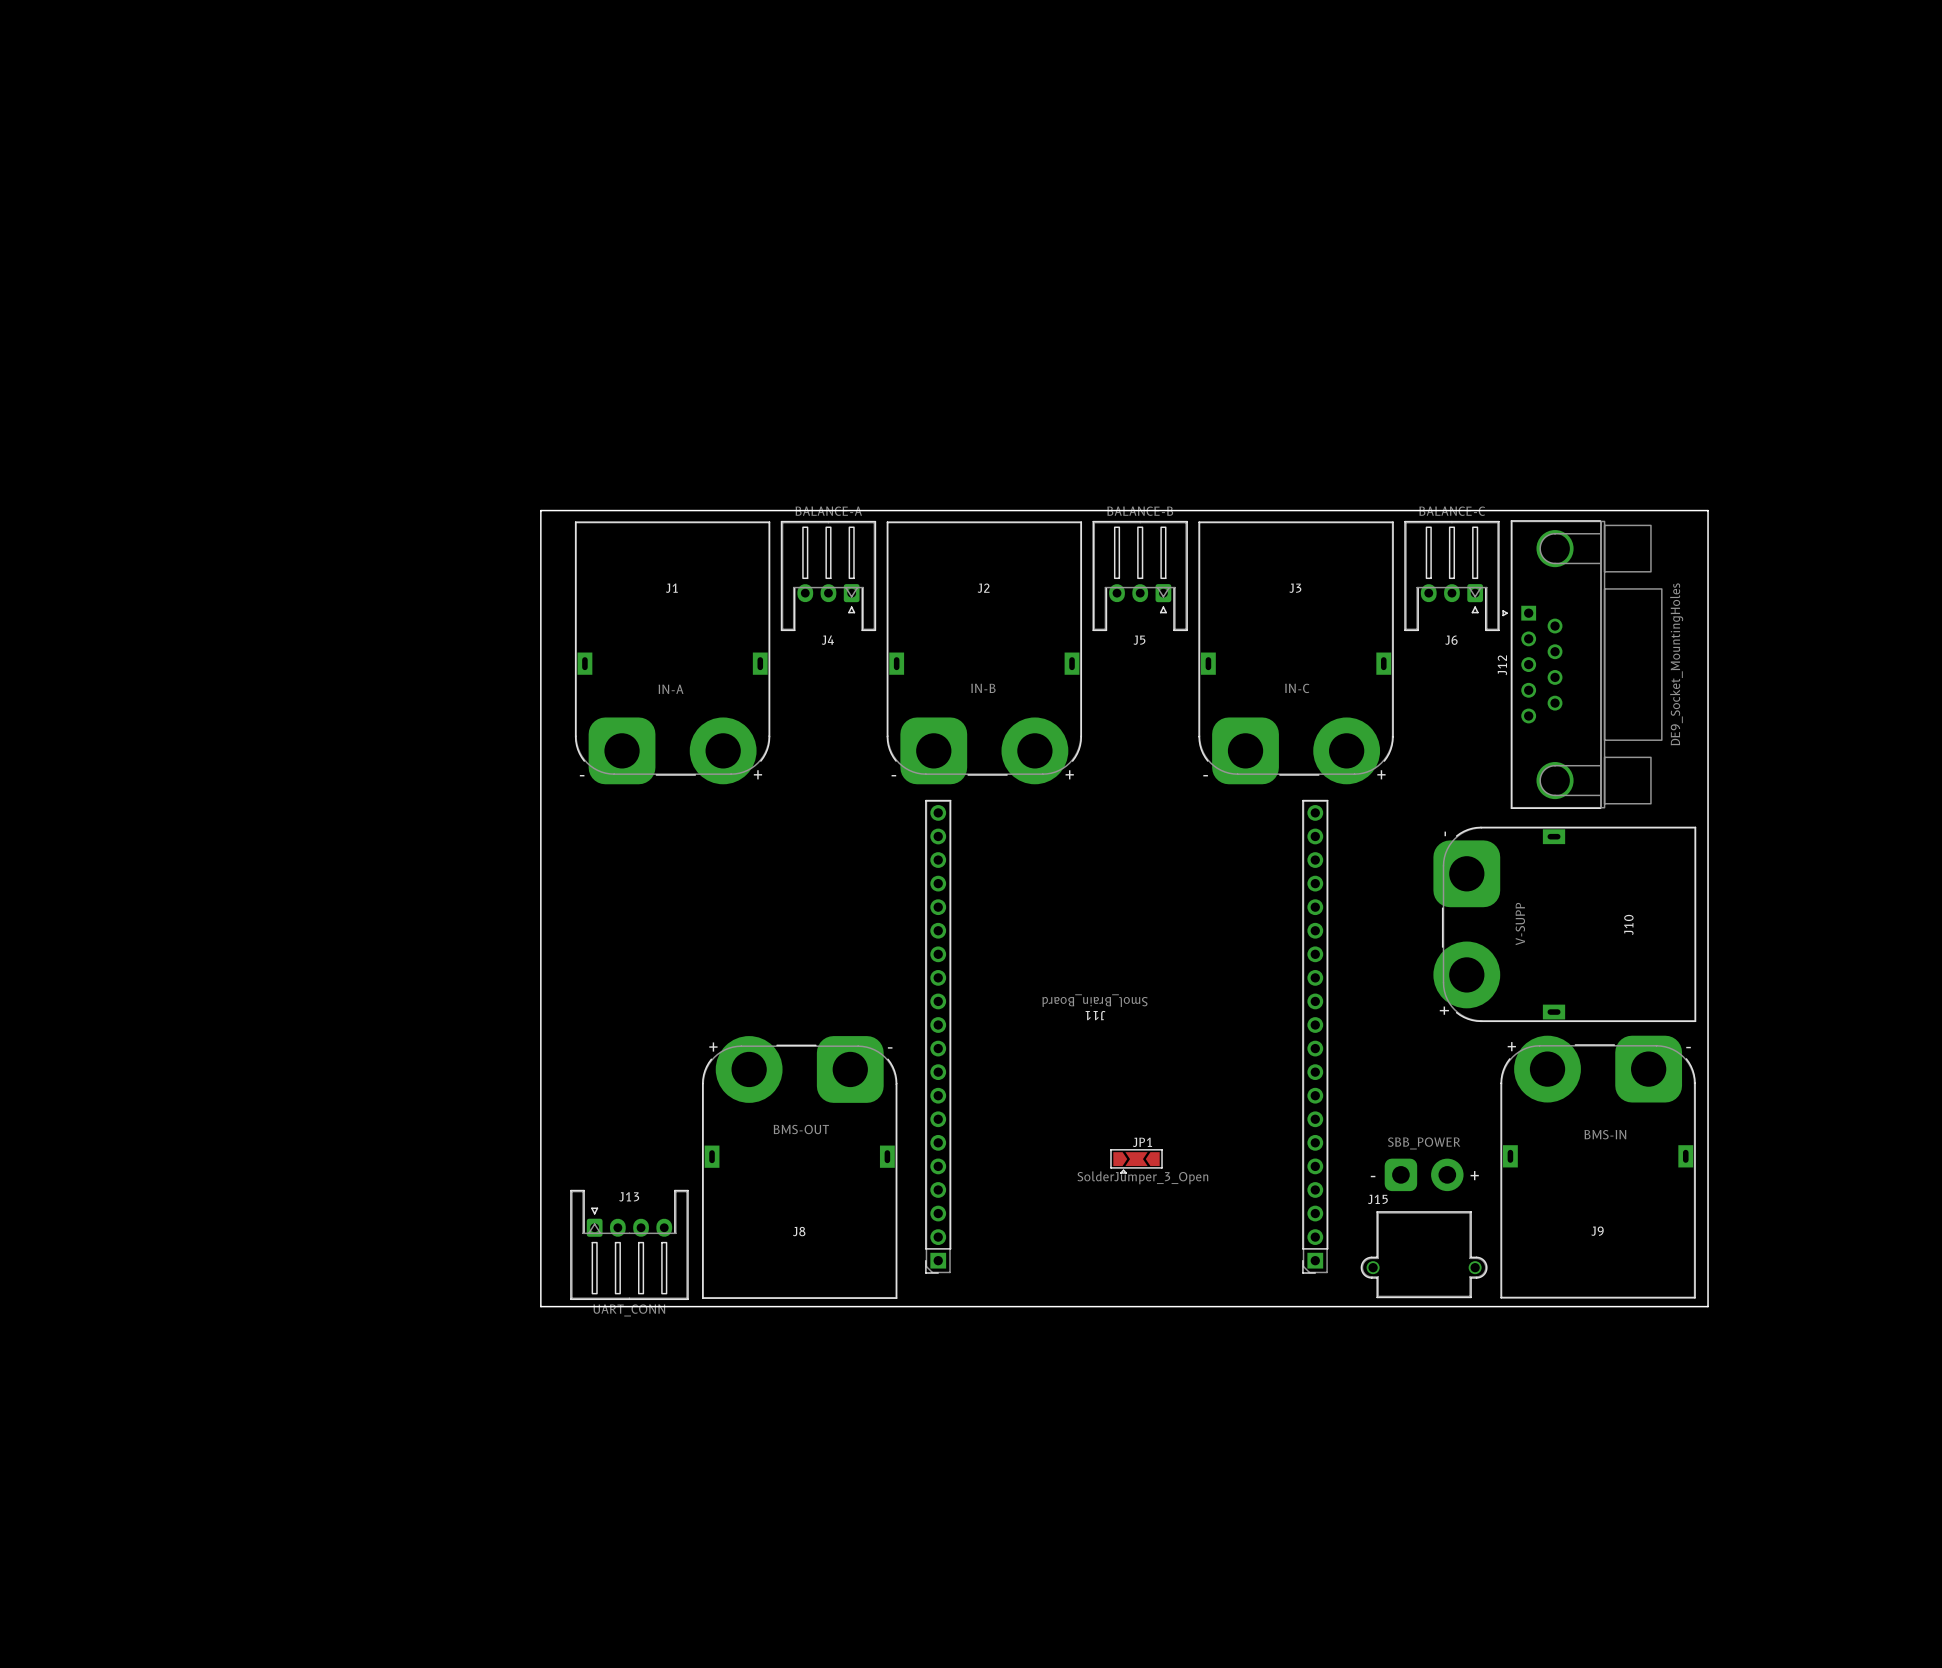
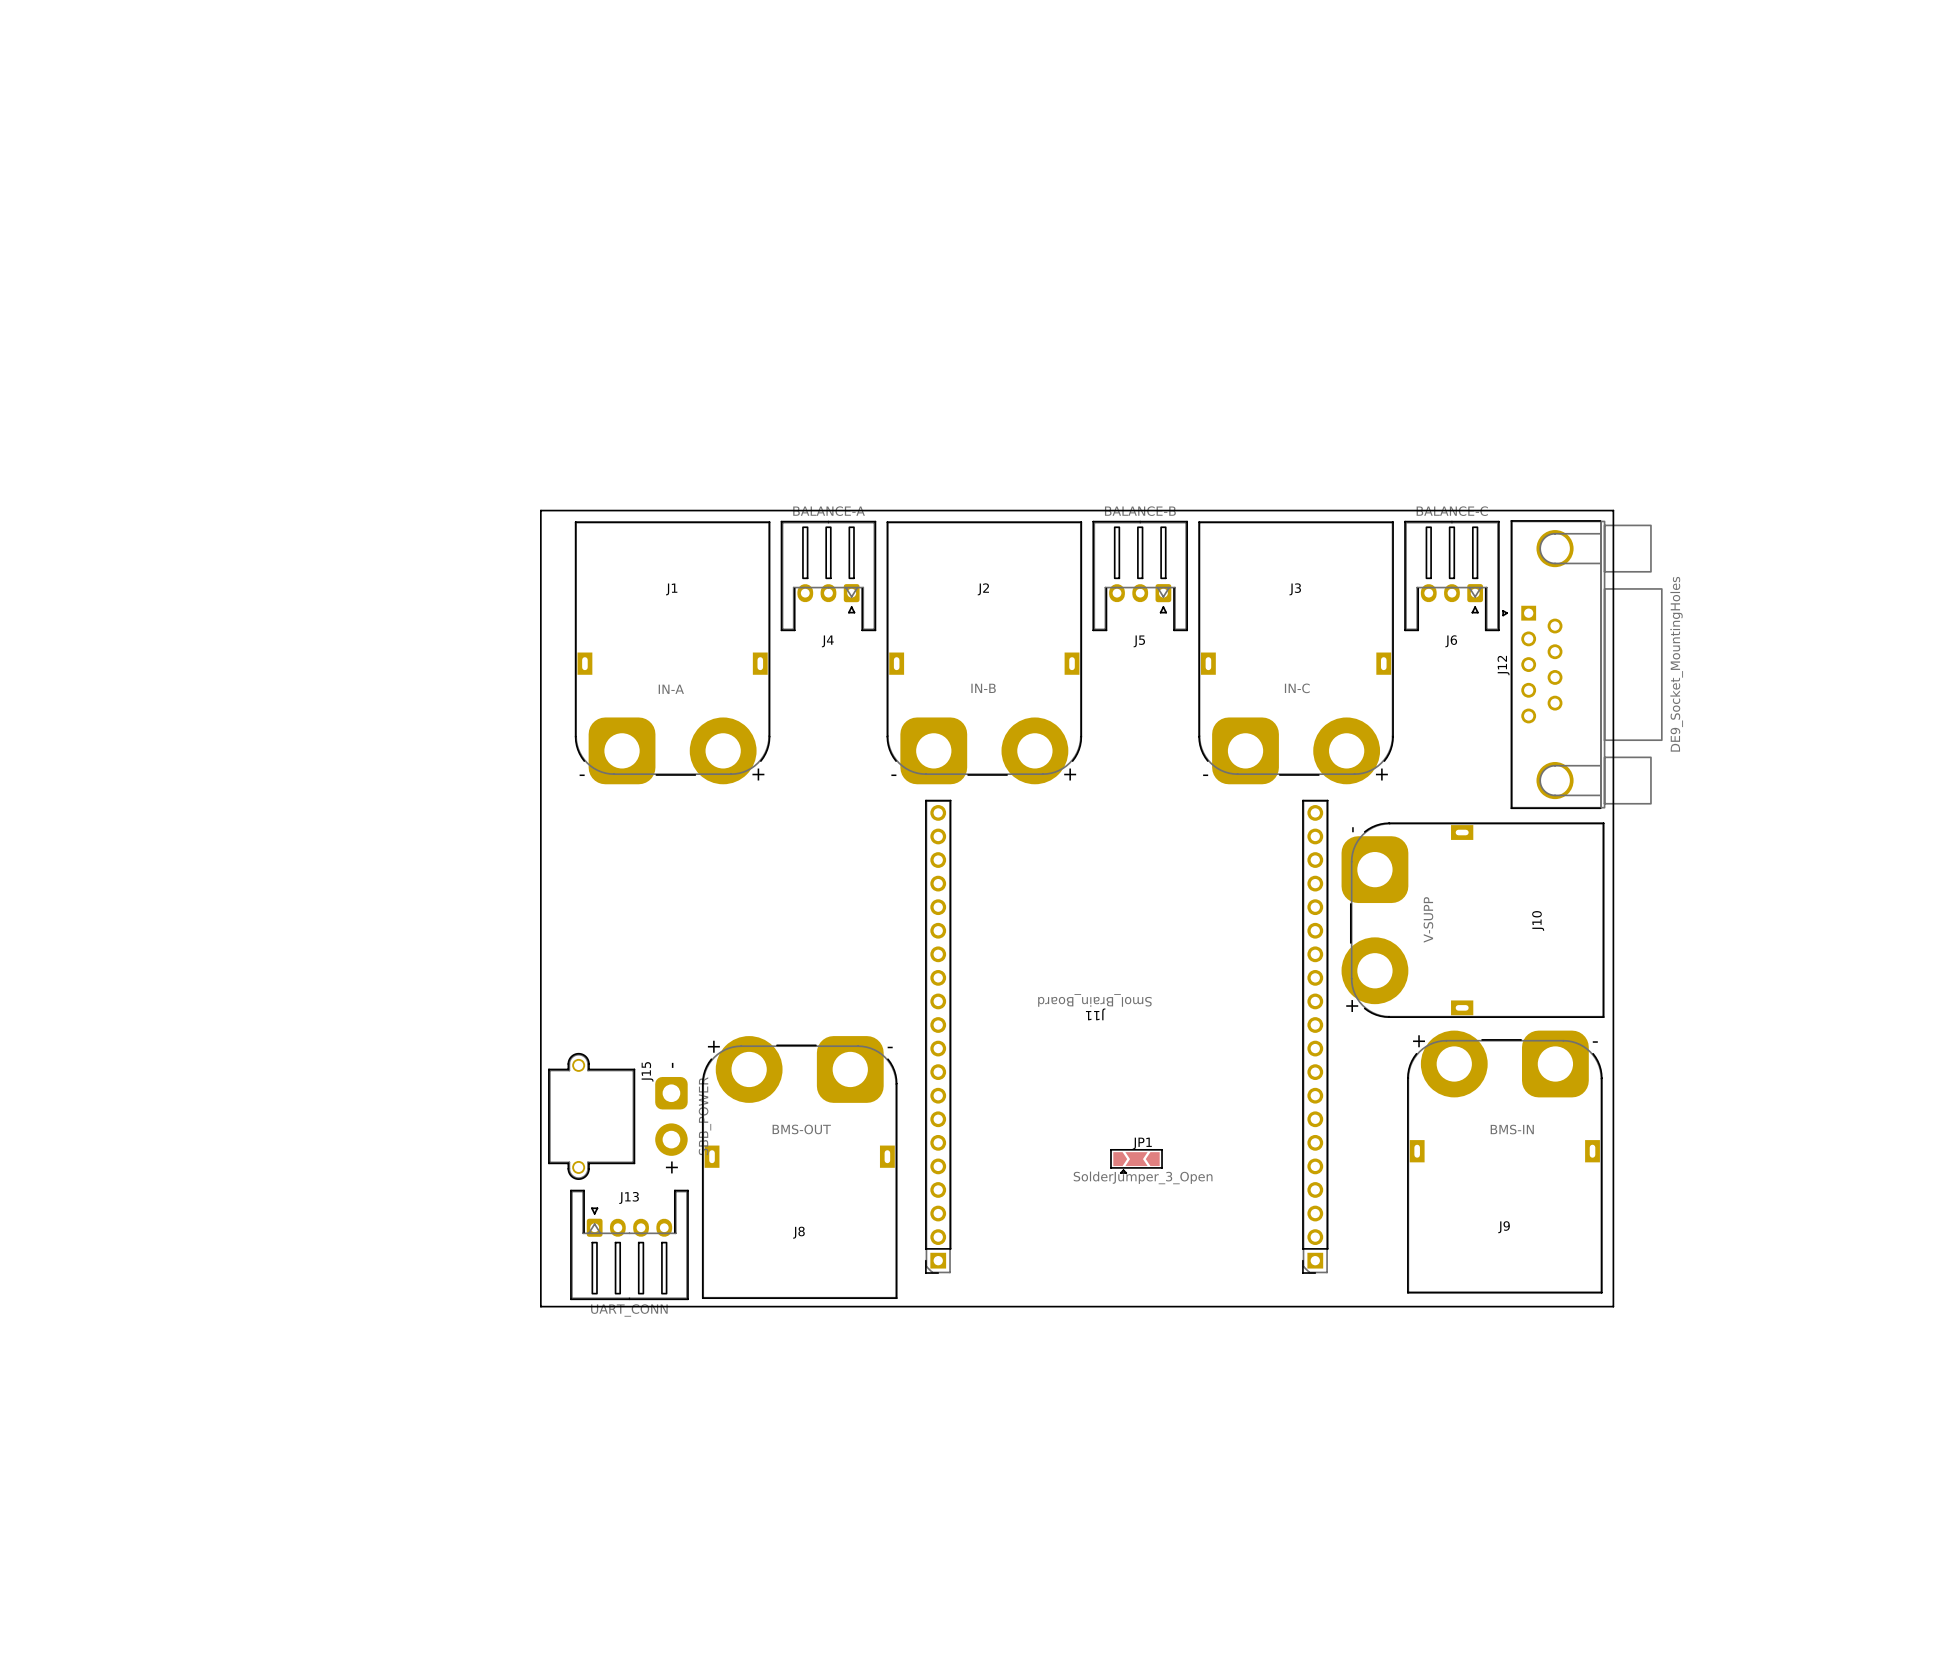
board edge: (1613, 510) (1708, 510) (1708, 1306) (1613, 1306) -> (1613, 510) (1613, 1306)
J10 position: (1564, 924) -> (1472, 920)
J9 position: (1598, 1167) -> (1504, 1161)
J15 rotation: 0° (1424, 1228) -> 90° clockwise (618, 1116)
J15 position: (1424, 1228) -> (618, 1116)

